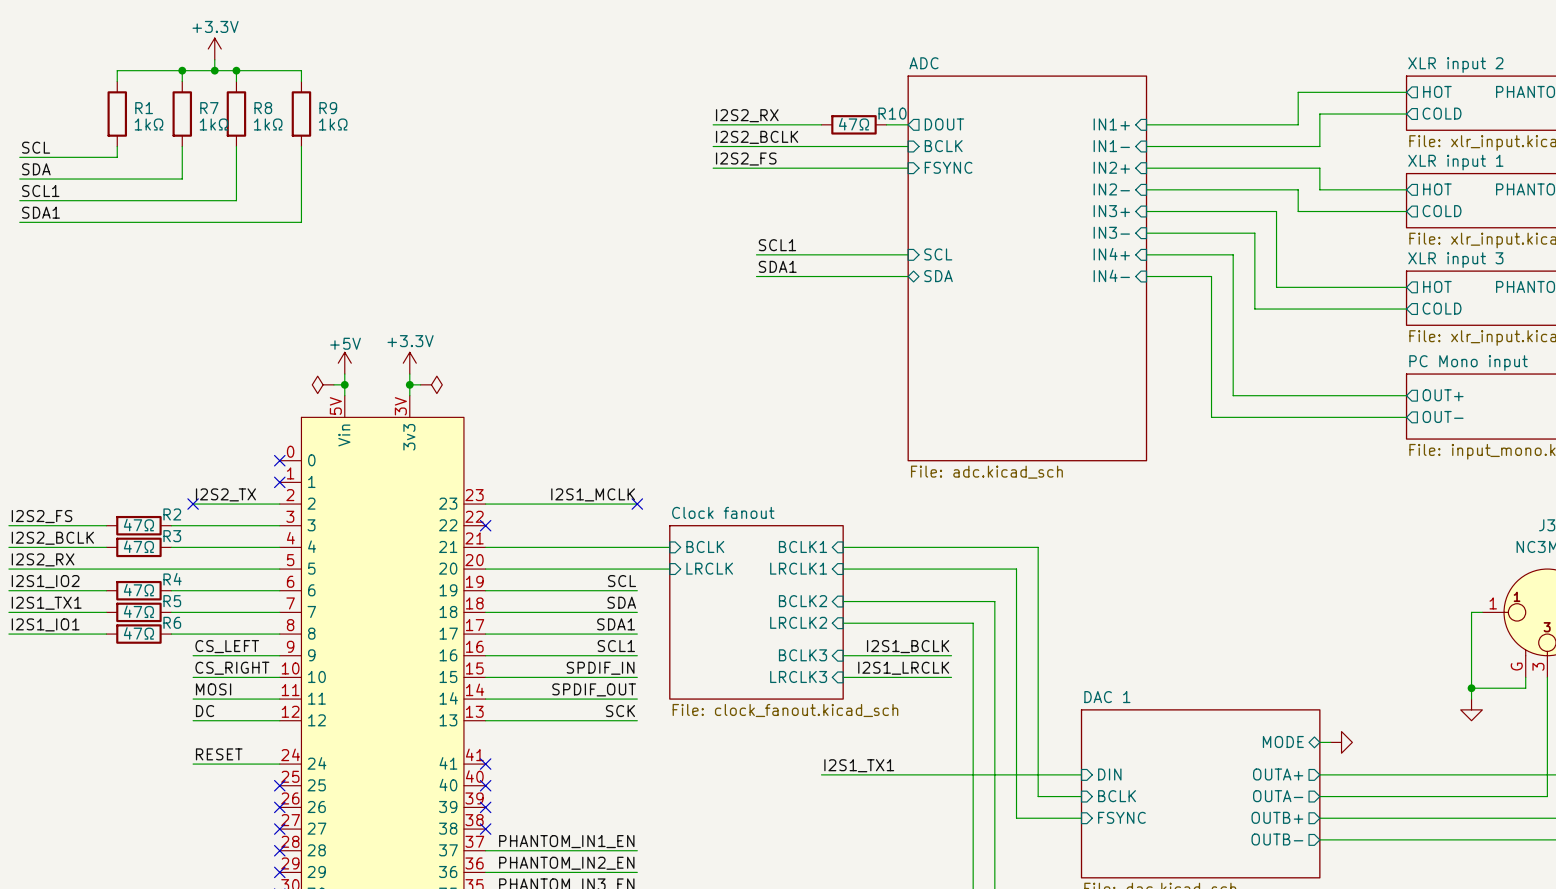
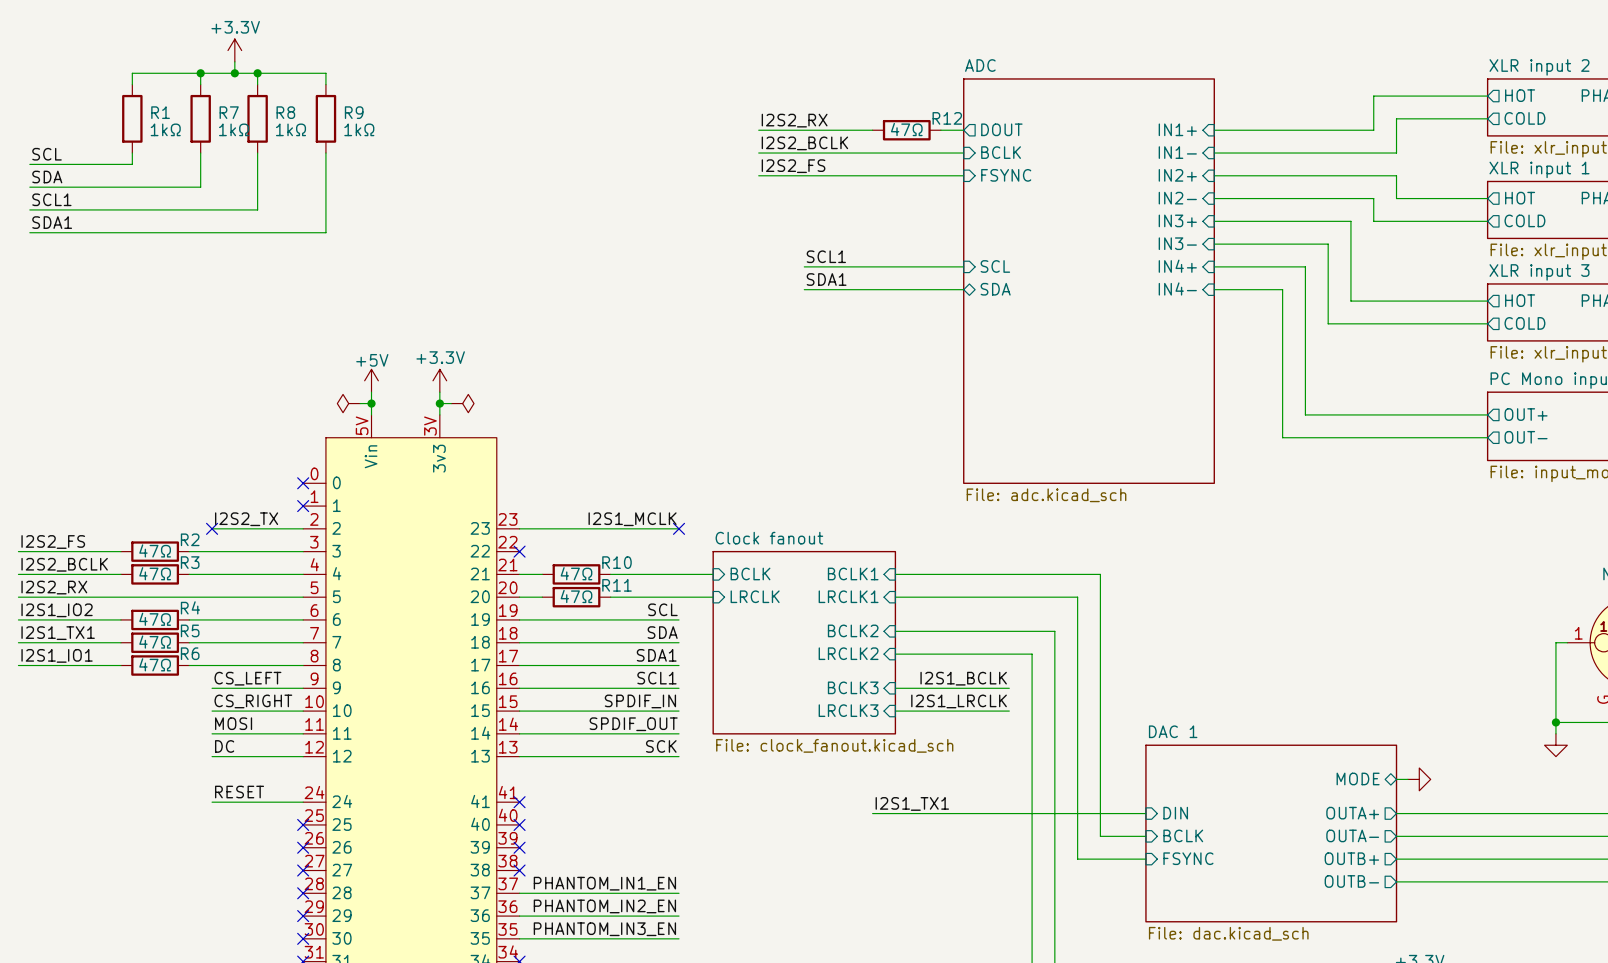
R10 name: R10 (892, 113) -> R12 (947, 118)
wire: (507, 547) (572, 547) -> none
R10: none -> 47Ω (576, 574)
wire: (507, 569) (572, 569) -> none
R11: none -> 47Ω (576, 597)

